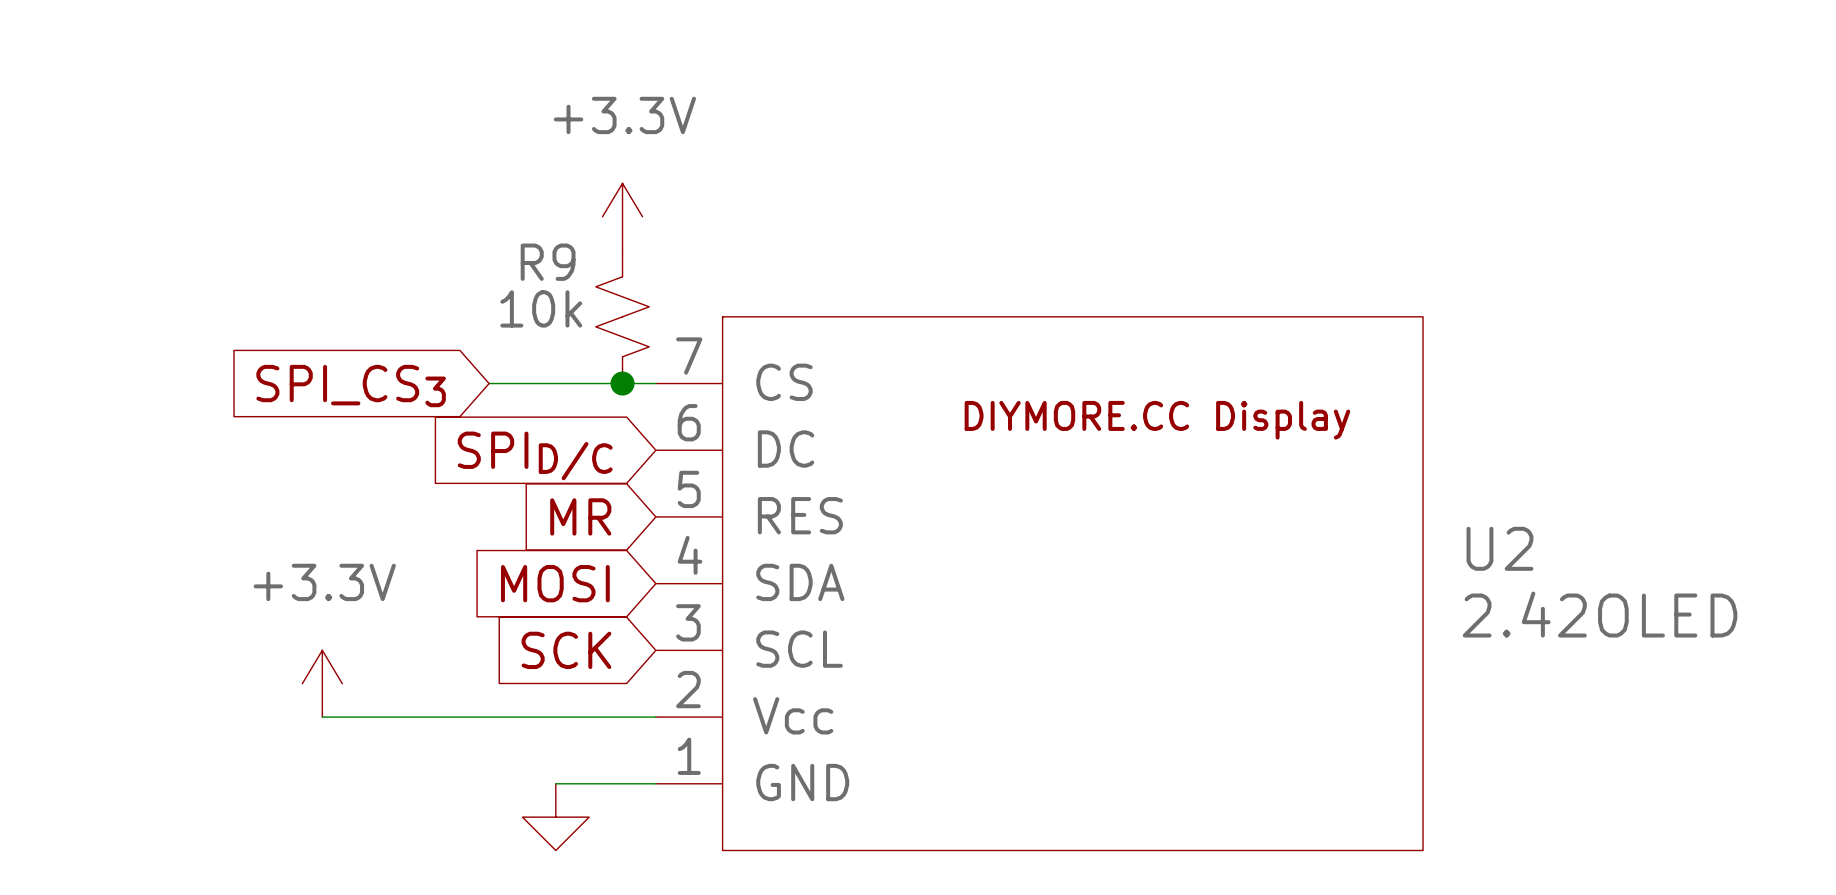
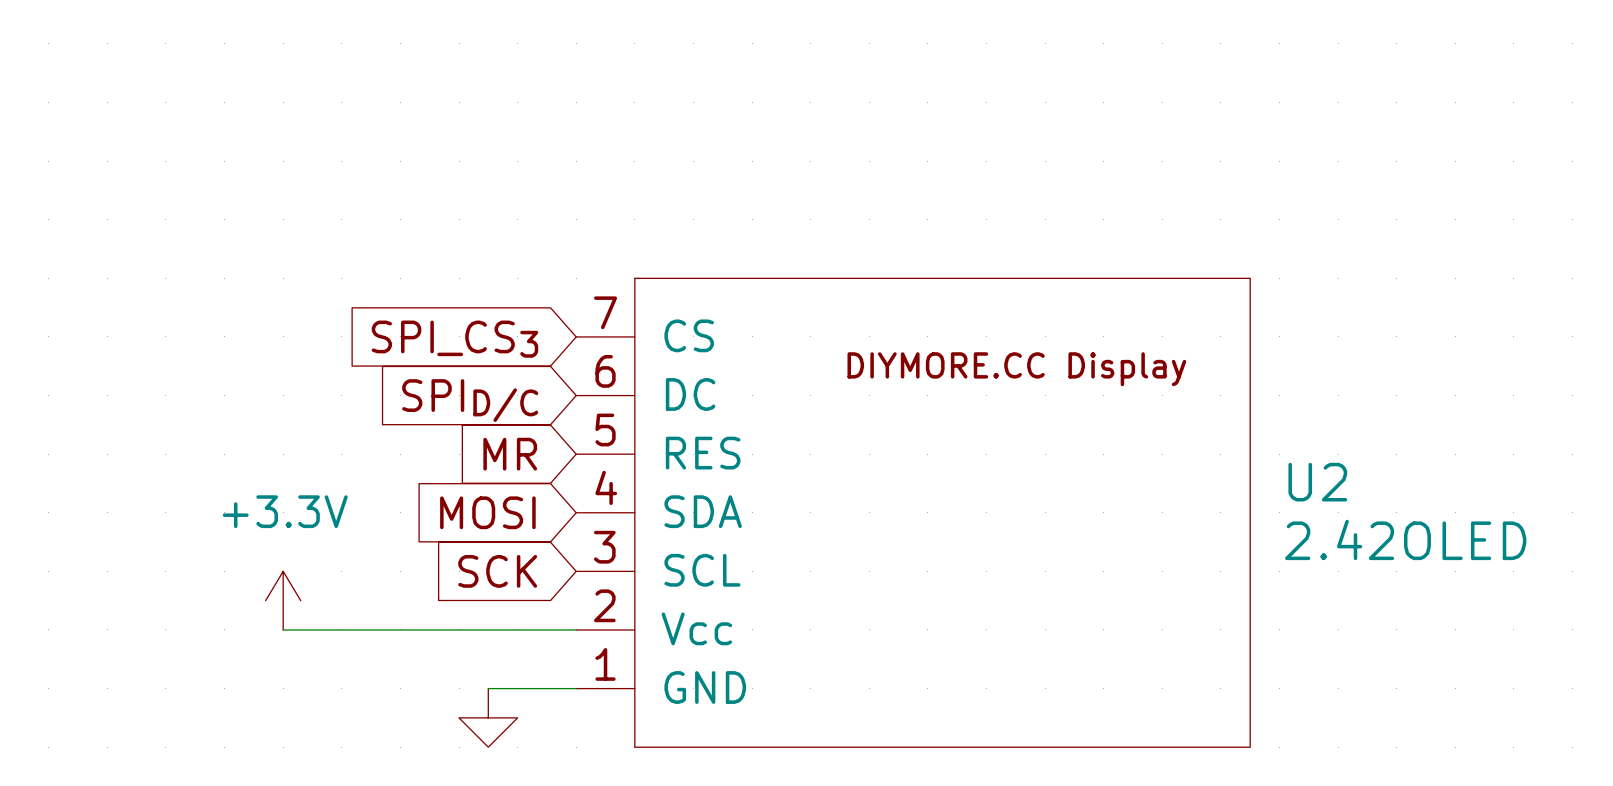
power symbol: +3.3V (622, 216) -> none
R9: 10k (622, 316) -> none
wire: (489, 383) (655, 383) -> none
junction: (622, 383) -> none
global label position: SPI_CS3 (351, 386) -> SPI_CS3 (454, 339)

